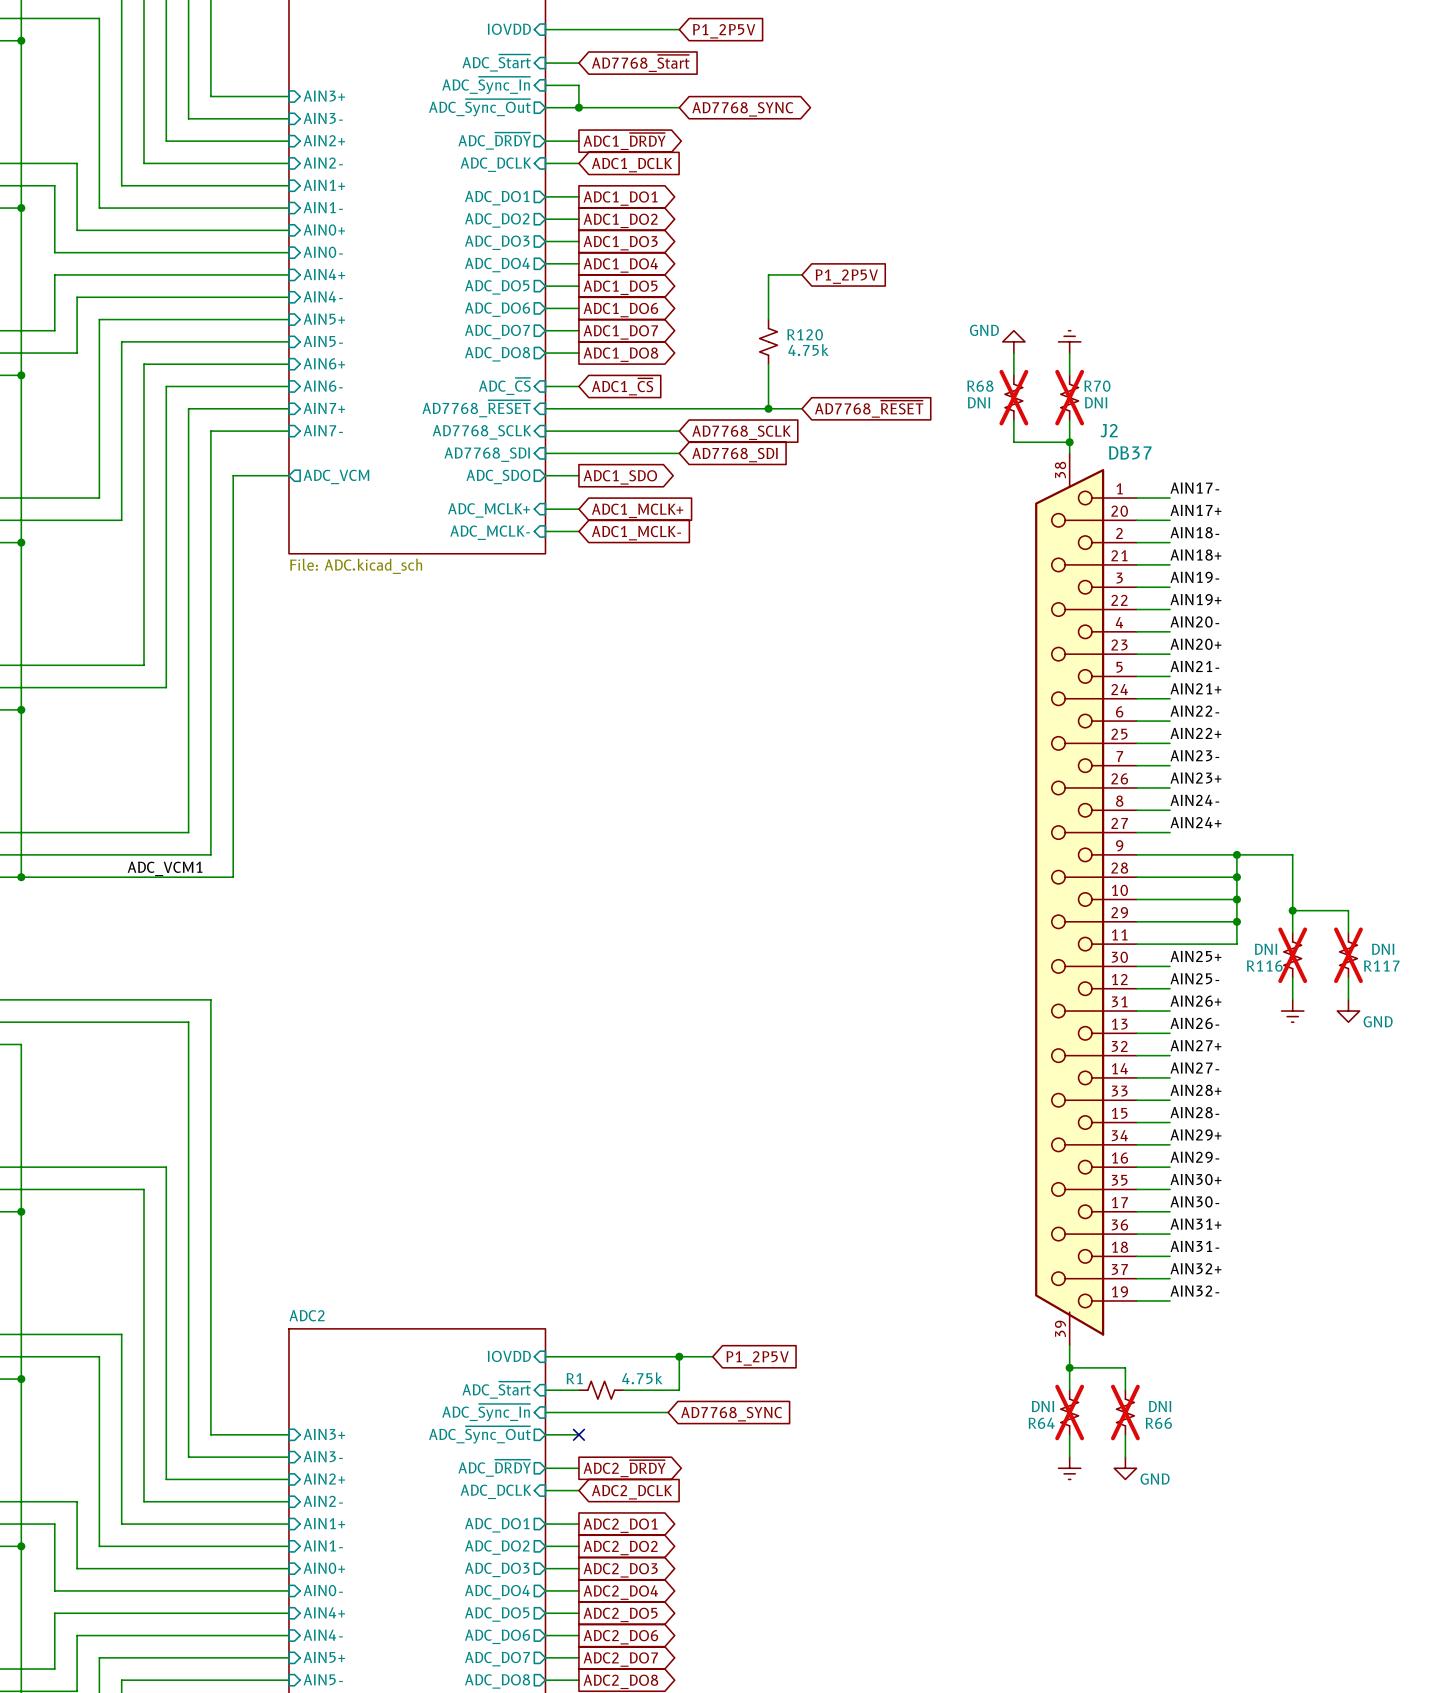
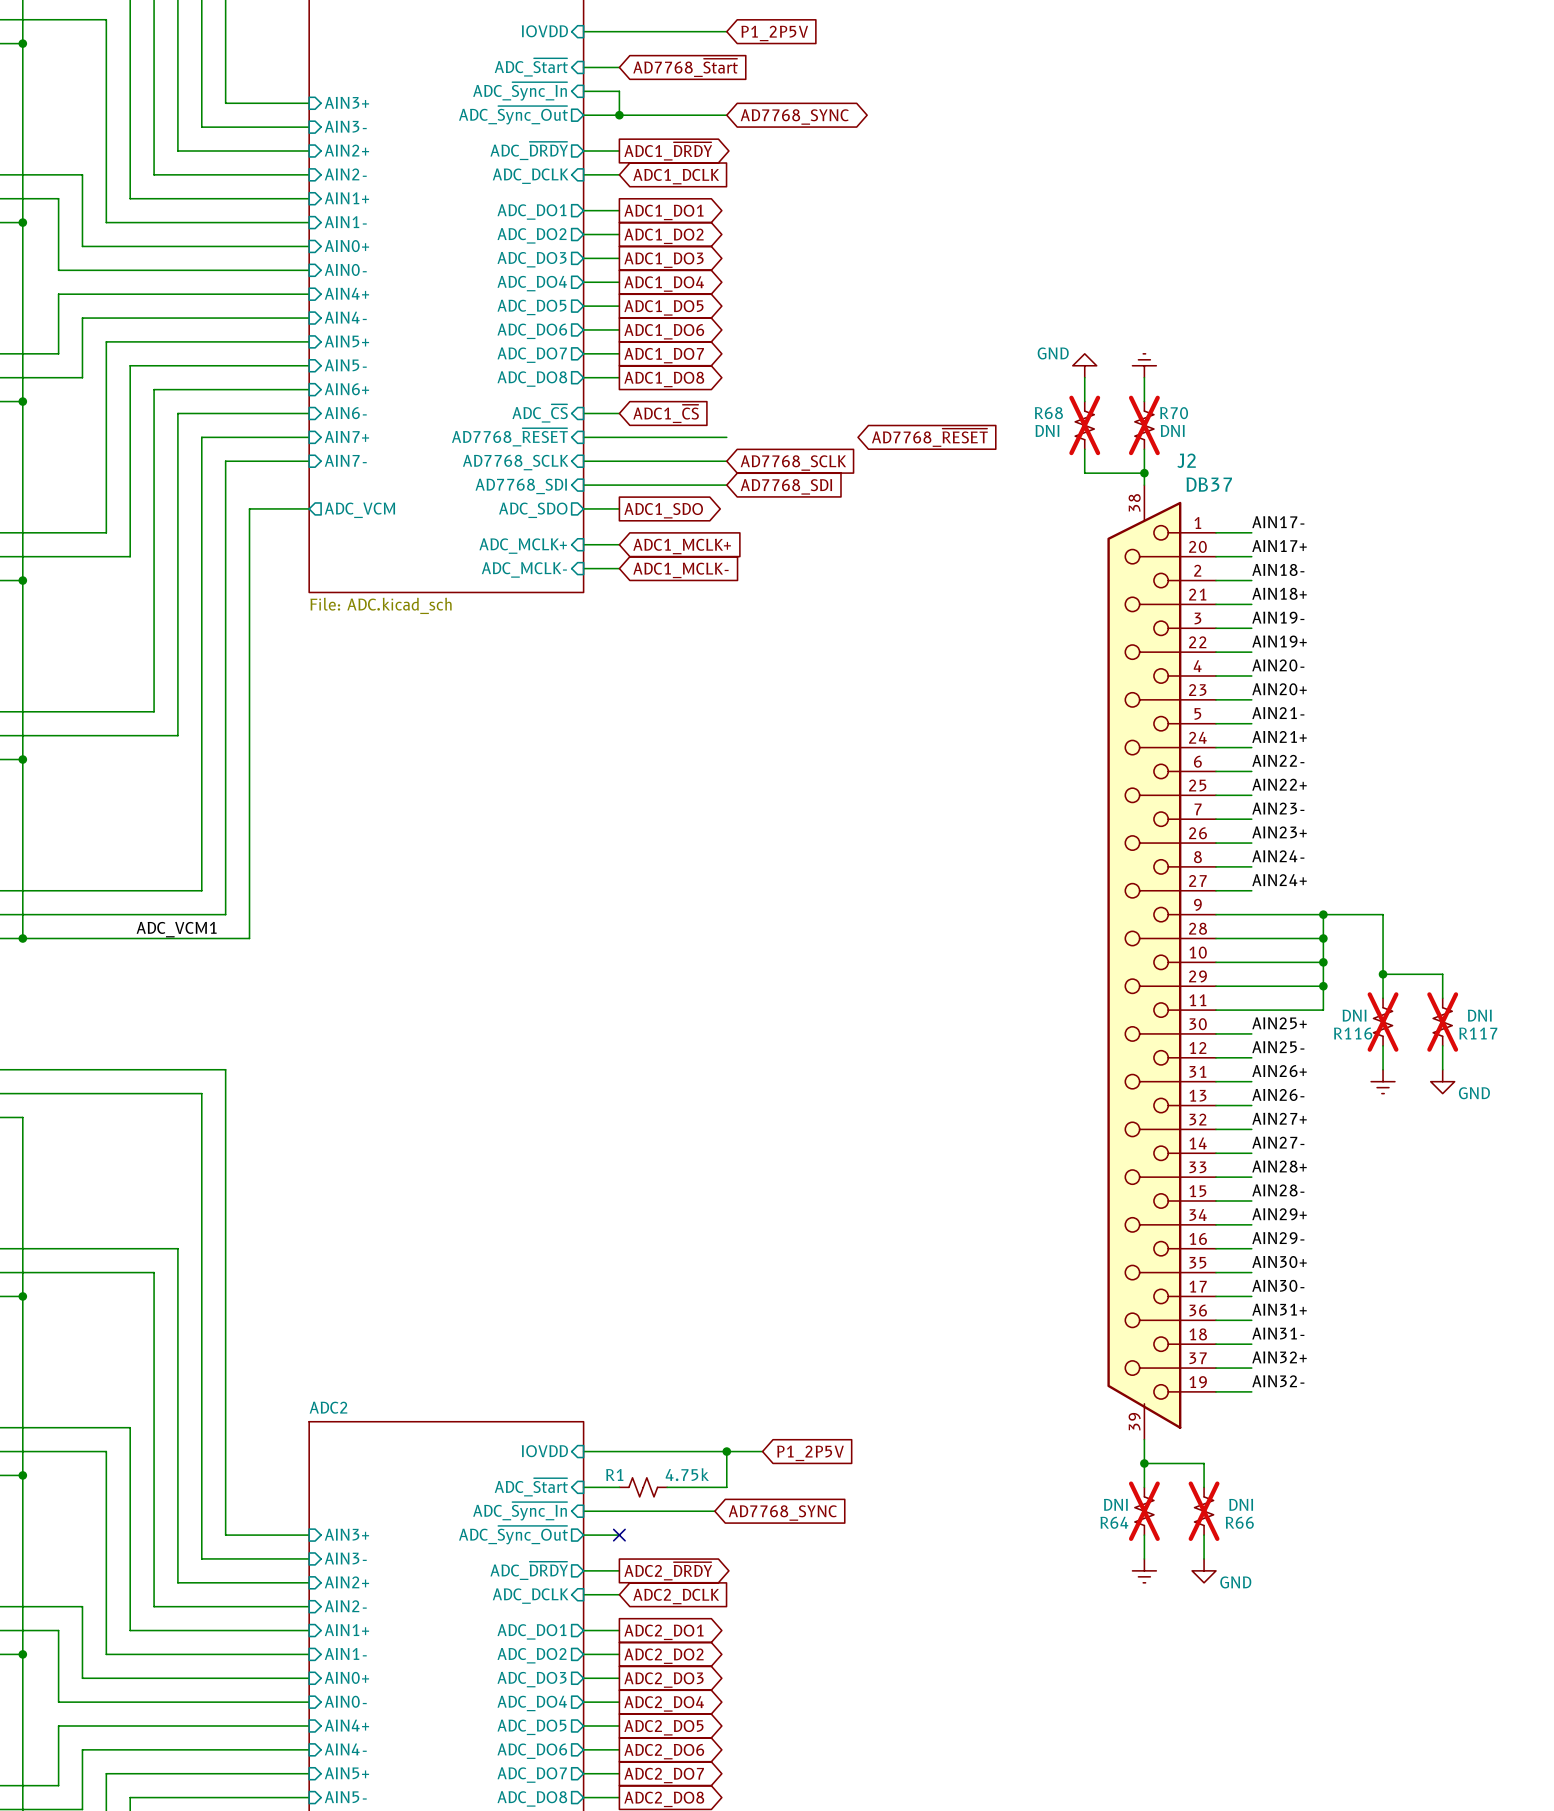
wire: (801, 274) (768, 274) (768, 319) -> none
global label: P1_2P5V (846, 276) -> none
R120: 4.75k (768, 341) -> none
wire: (768, 364) (768, 408) -> none
wire: (679, 408) (801, 408) -> none
junction: (768, 408) -> none

